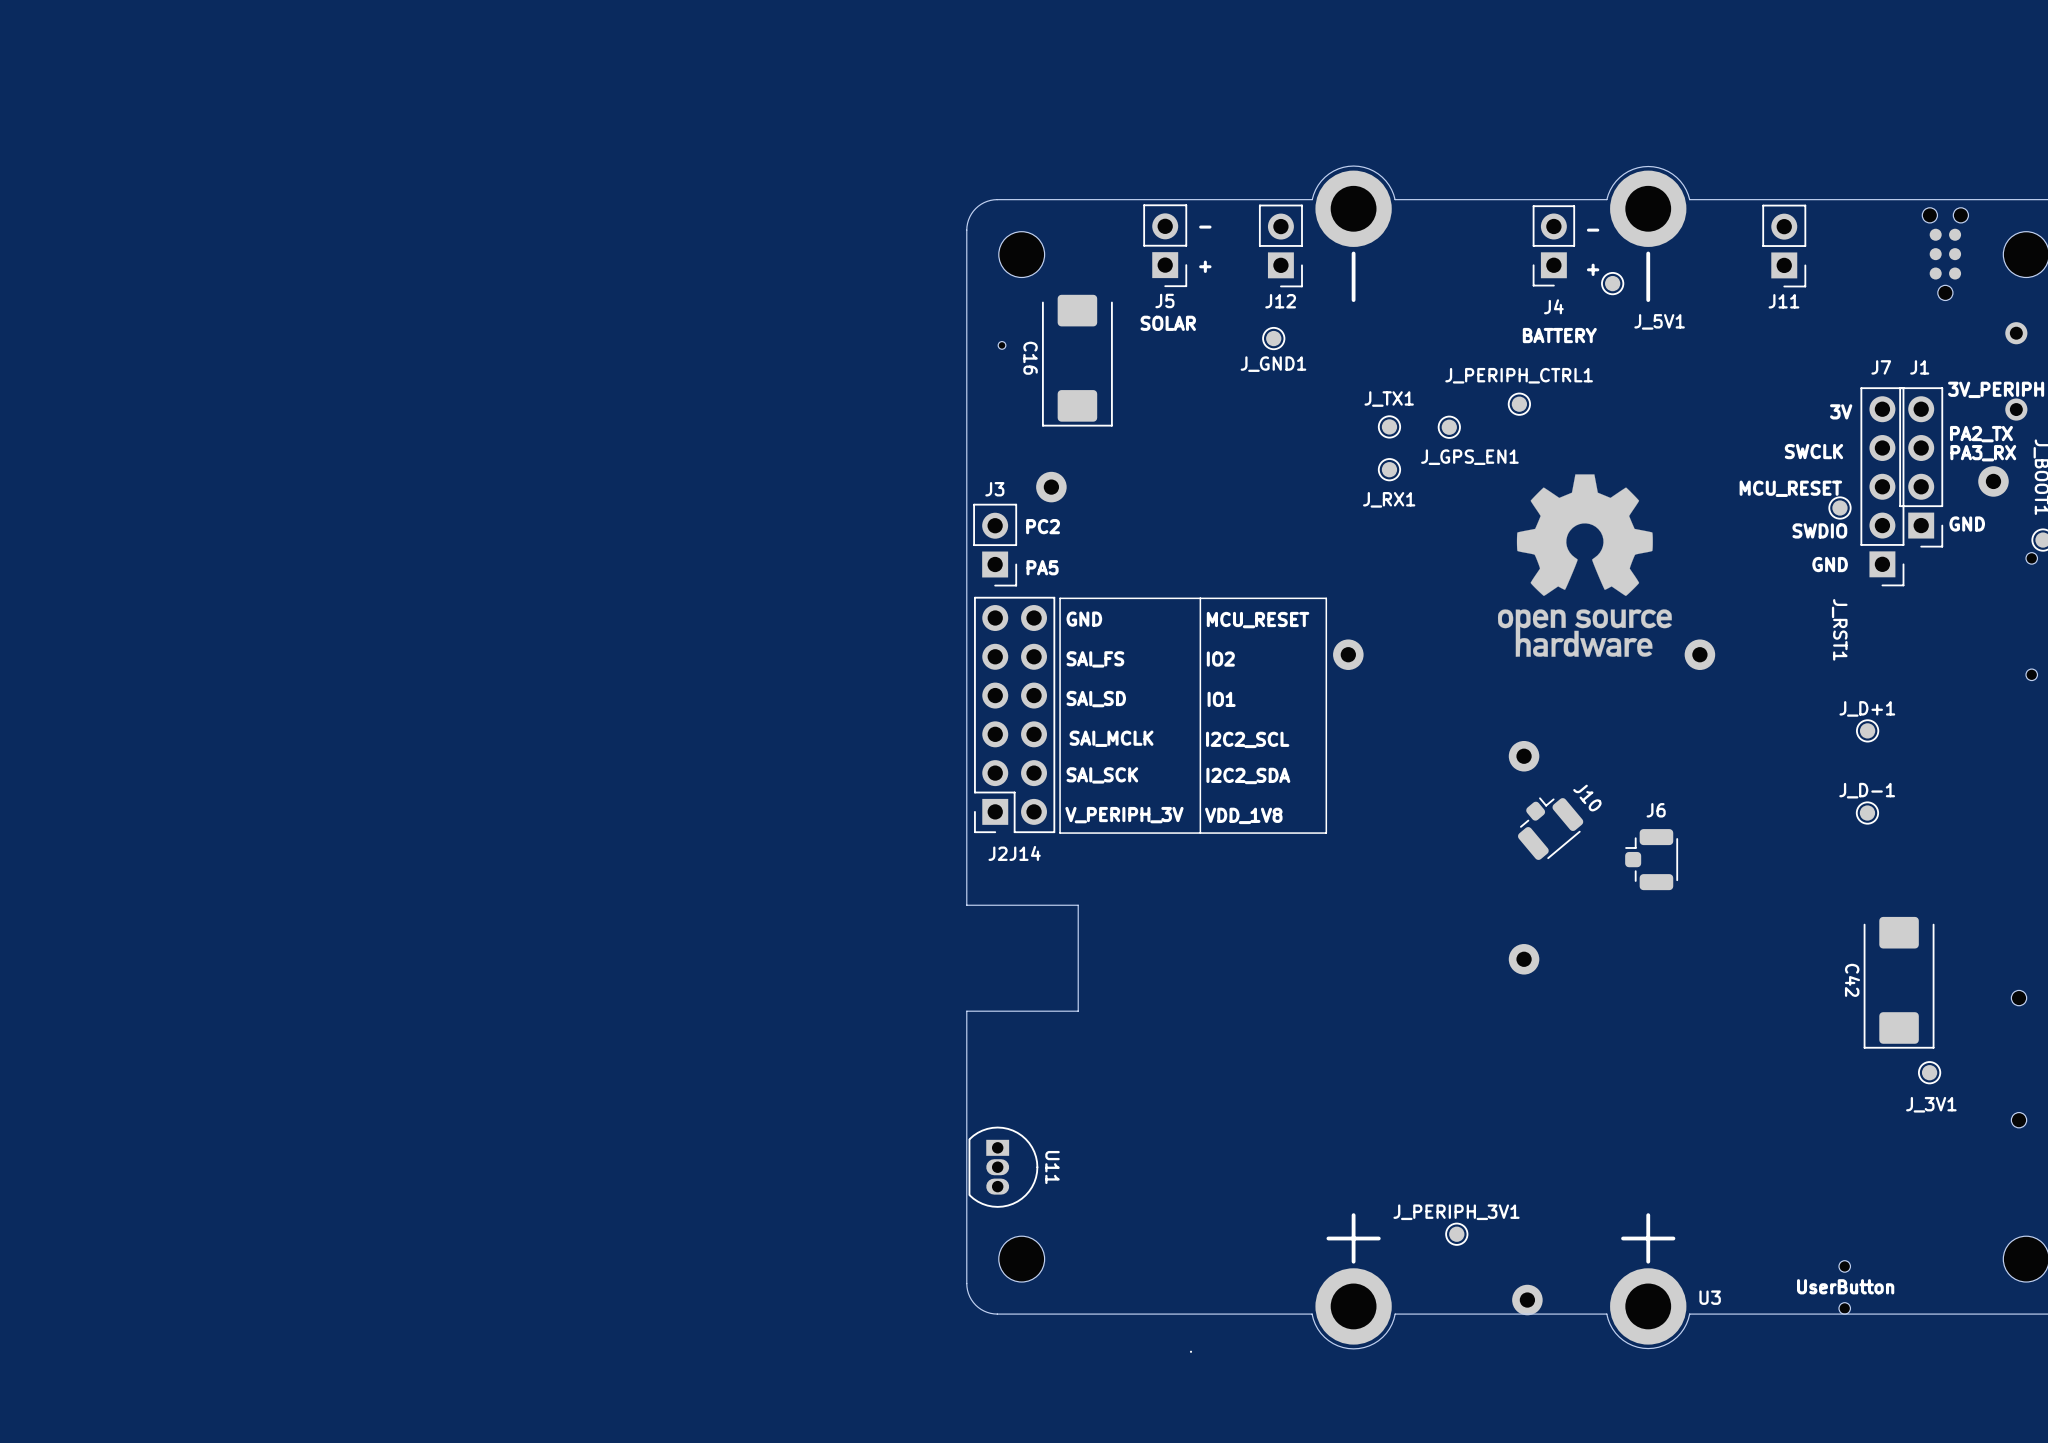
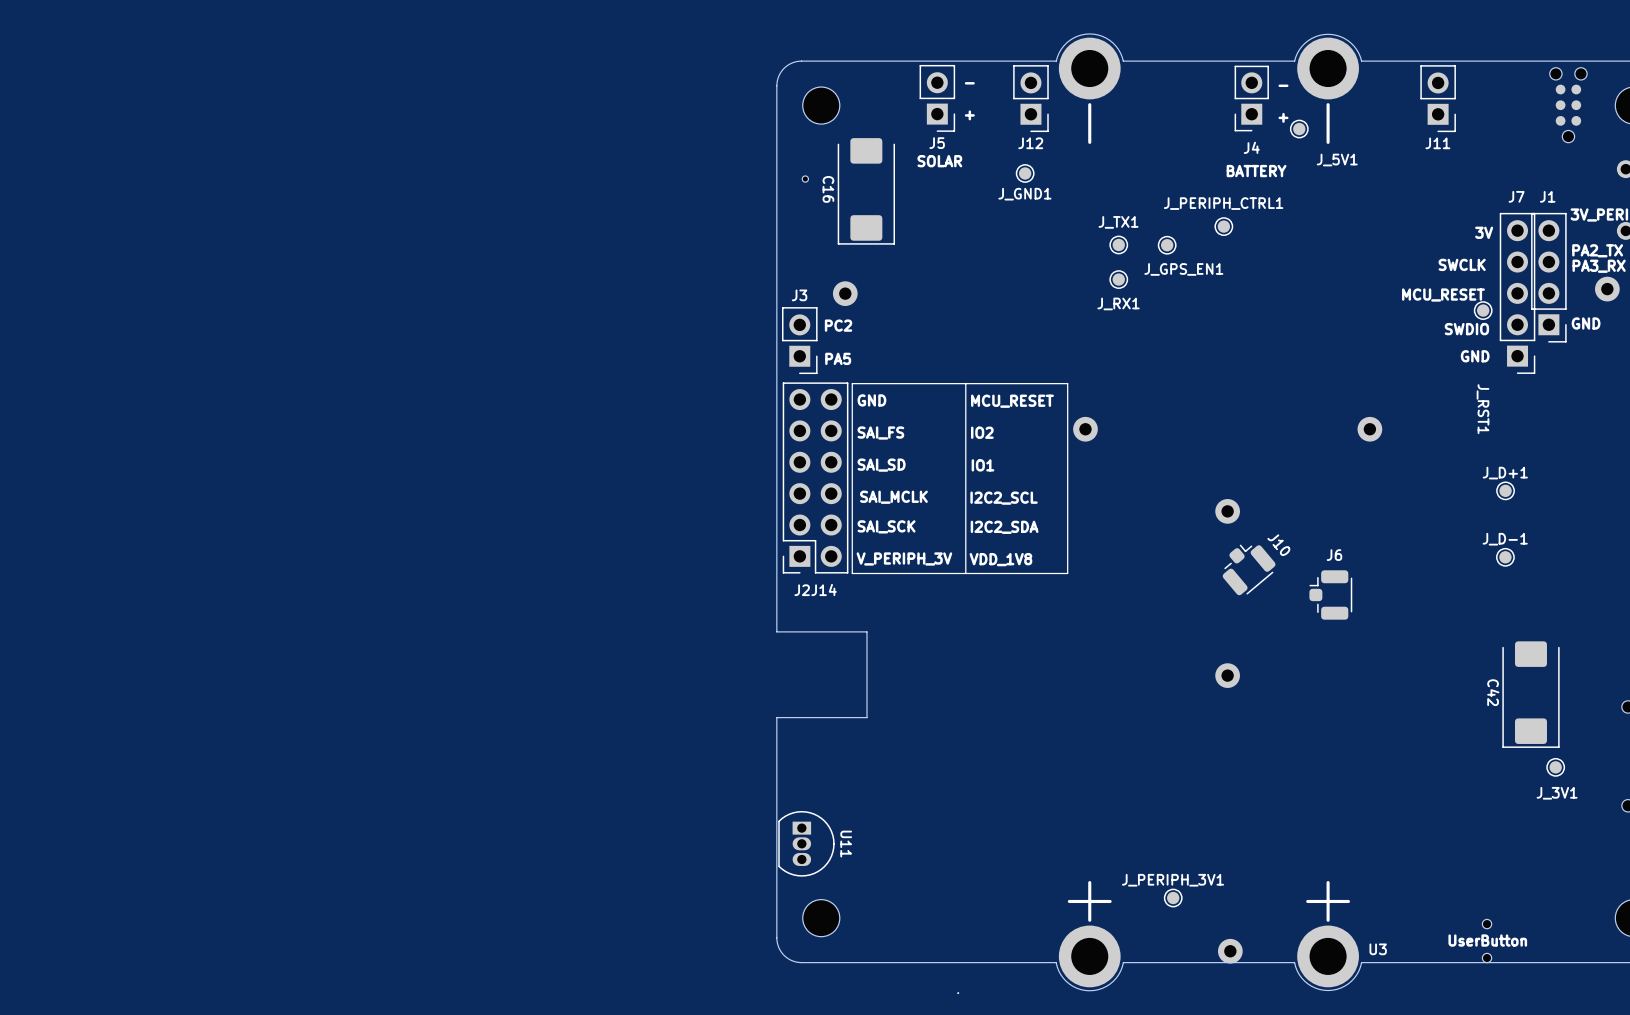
part: (1584, 565) -> none

